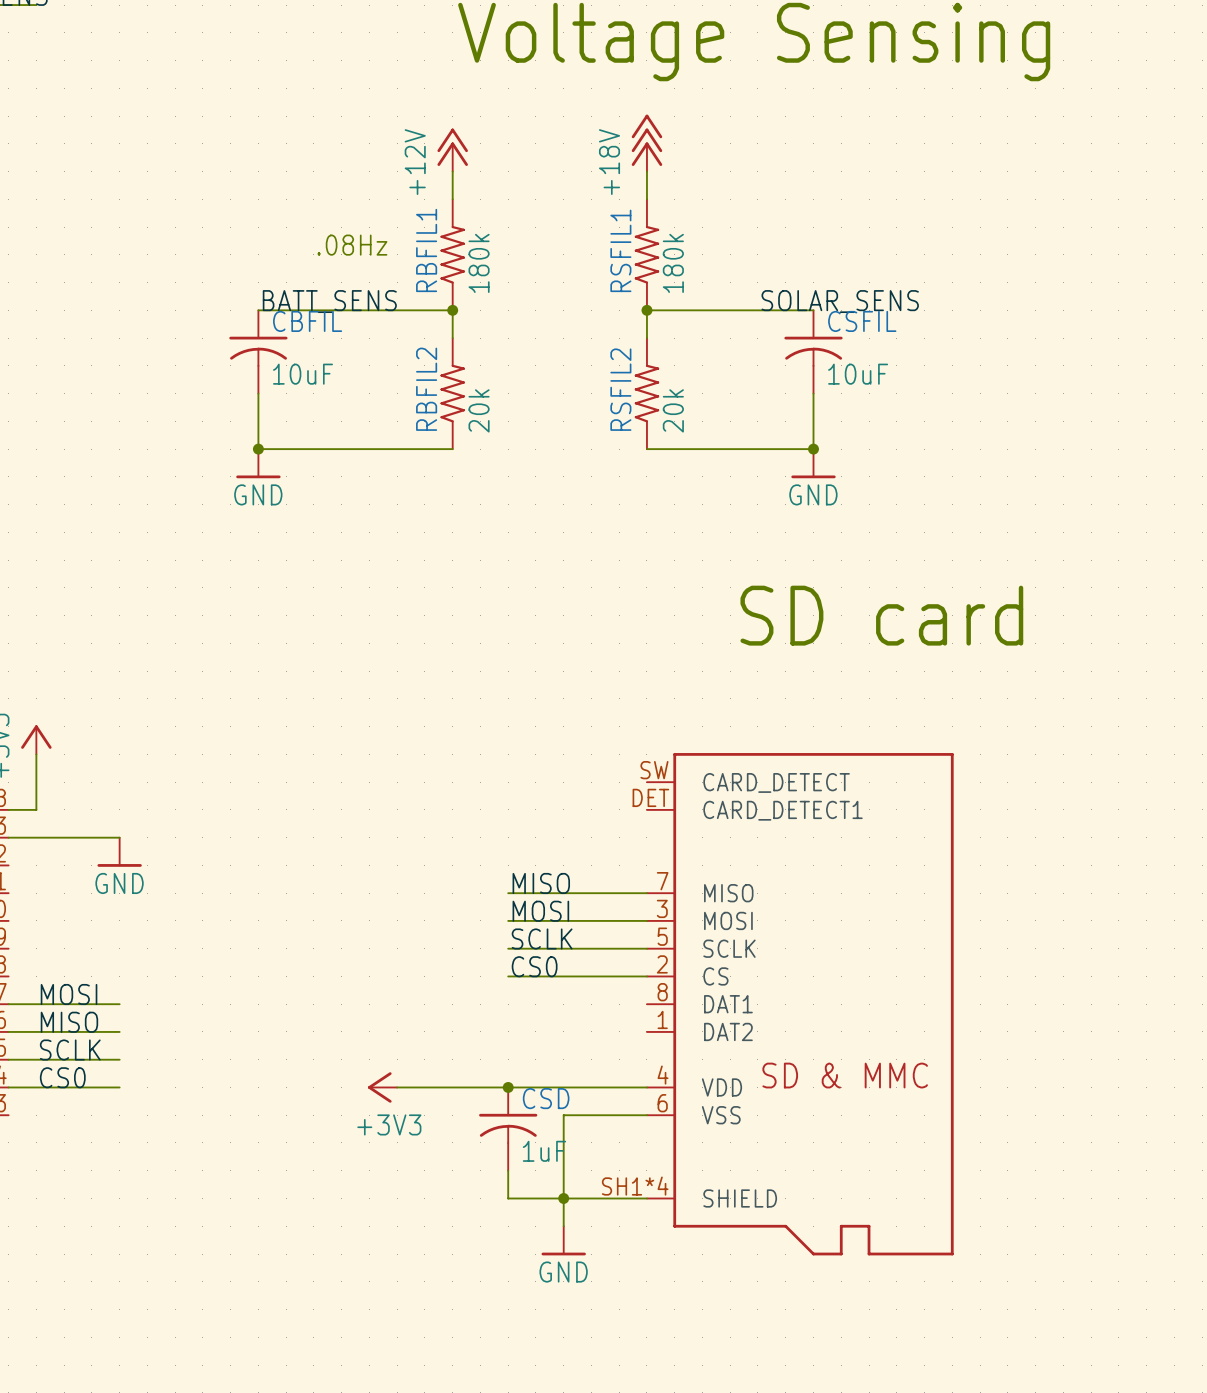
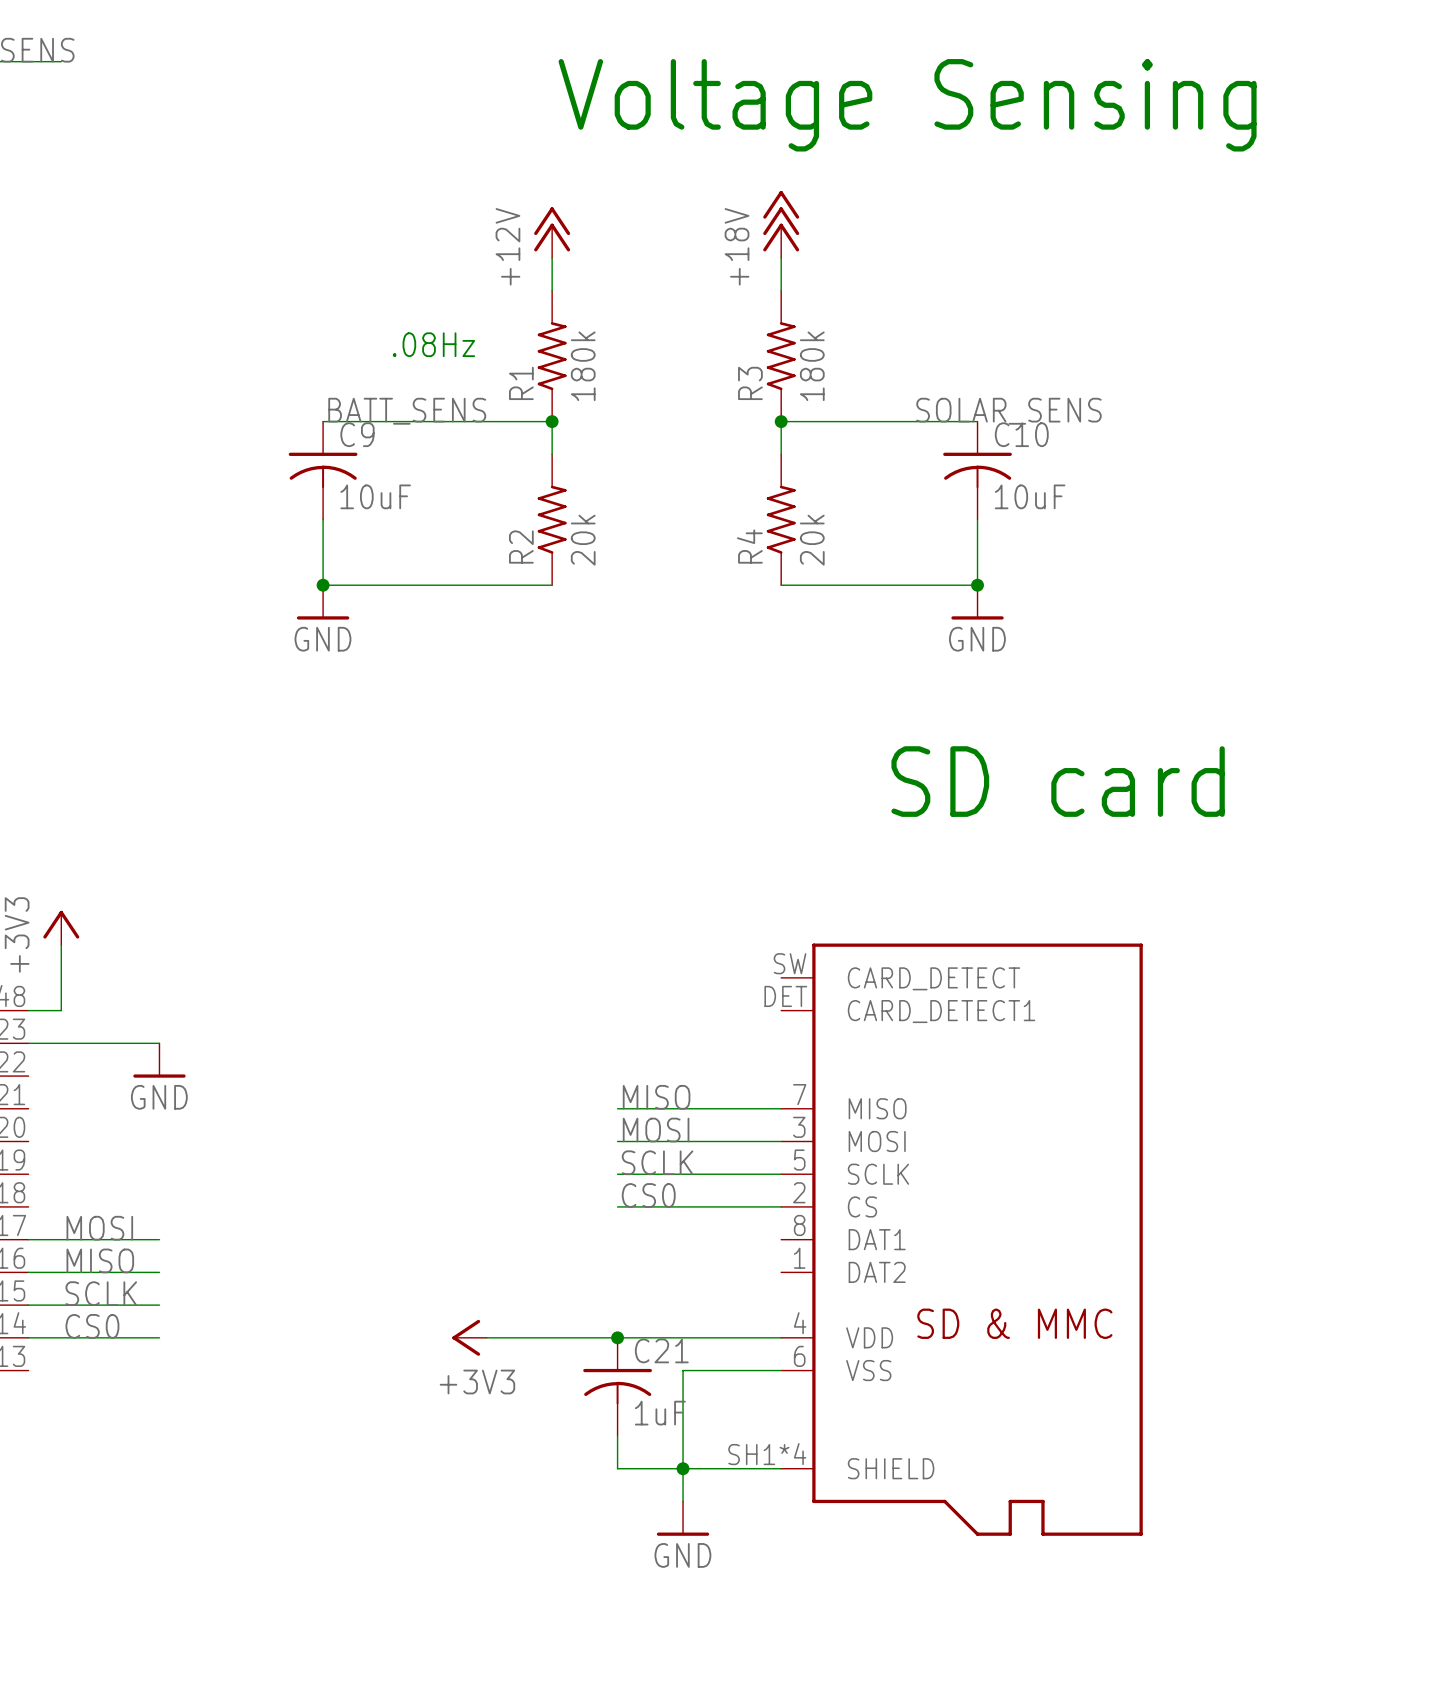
RBFIL1 name: RBFIL1 (426, 250) -> R1 (521, 383)
RSFIL1 name: RSFIL1 (620, 250) -> R3 (750, 383)
CBFIL name: CBFIL (307, 321) -> C9 (357, 434)
CSFIL name: CSFIL (862, 321) -> C10 (1021, 434)
RBFIL2 name: RBFIL2 (426, 389) -> R2 (521, 547)
RSFIL2 name: RSFIL2 (620, 389) -> R4 (749, 546)
CSD name: CSD (546, 1098) -> C21 (661, 1350)

